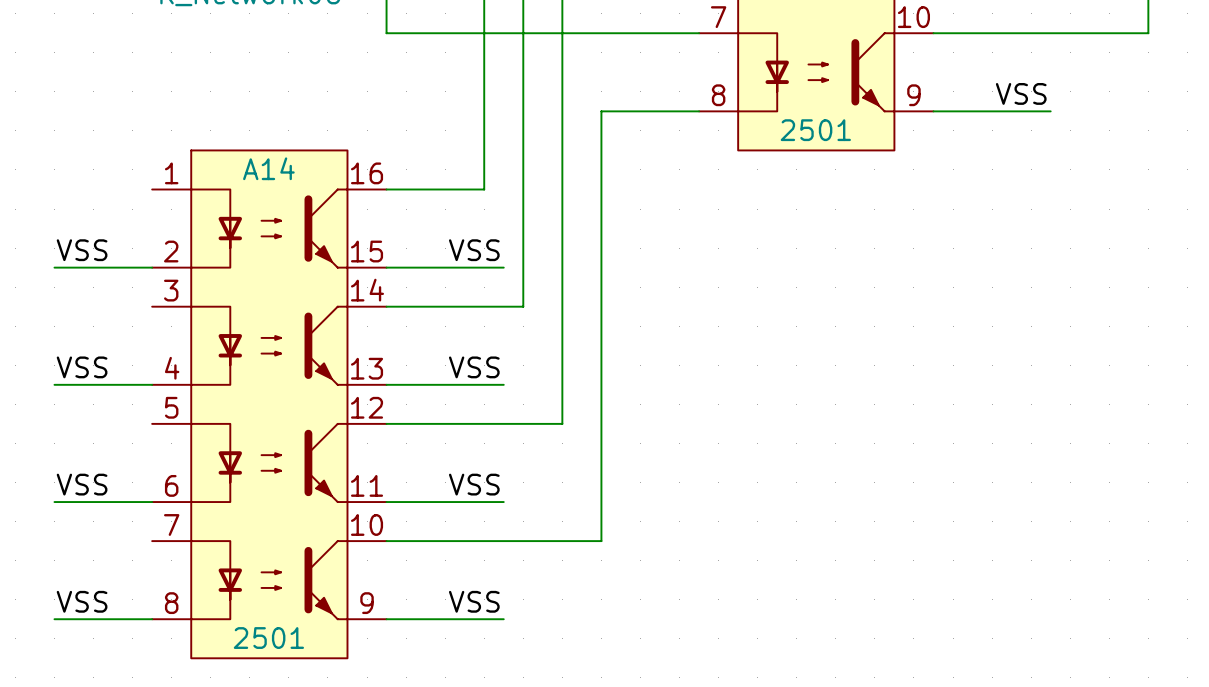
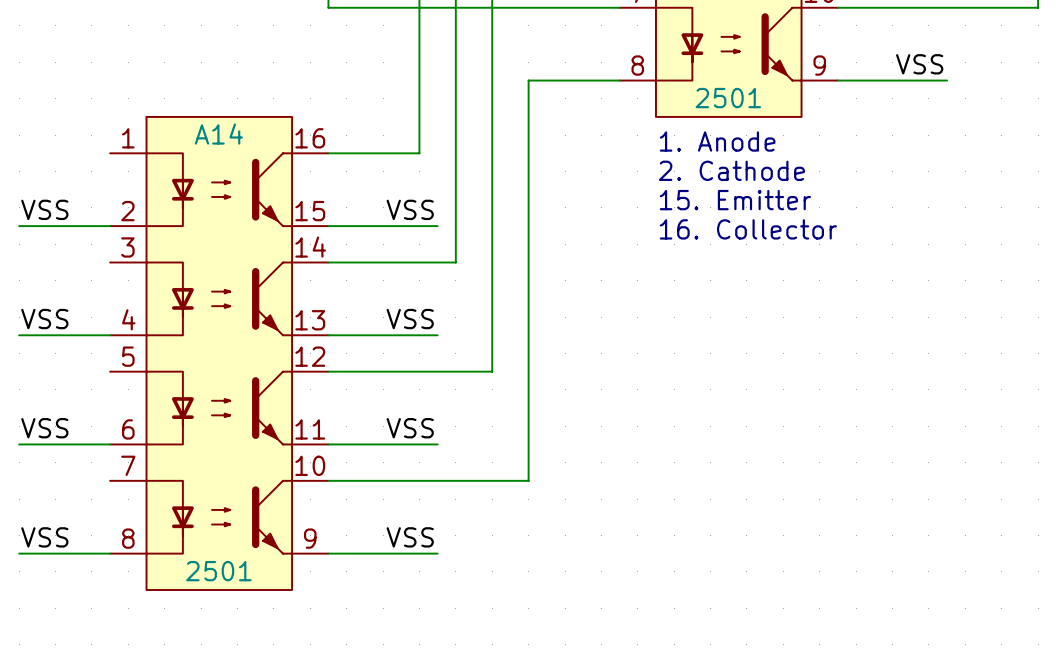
text: none -> 1. Anode (717, 141)
text: none -> 2. Cathode (731, 170)
text: none -> 15. Emitter (735, 200)
text: none -> 16. Collector (748, 229)

